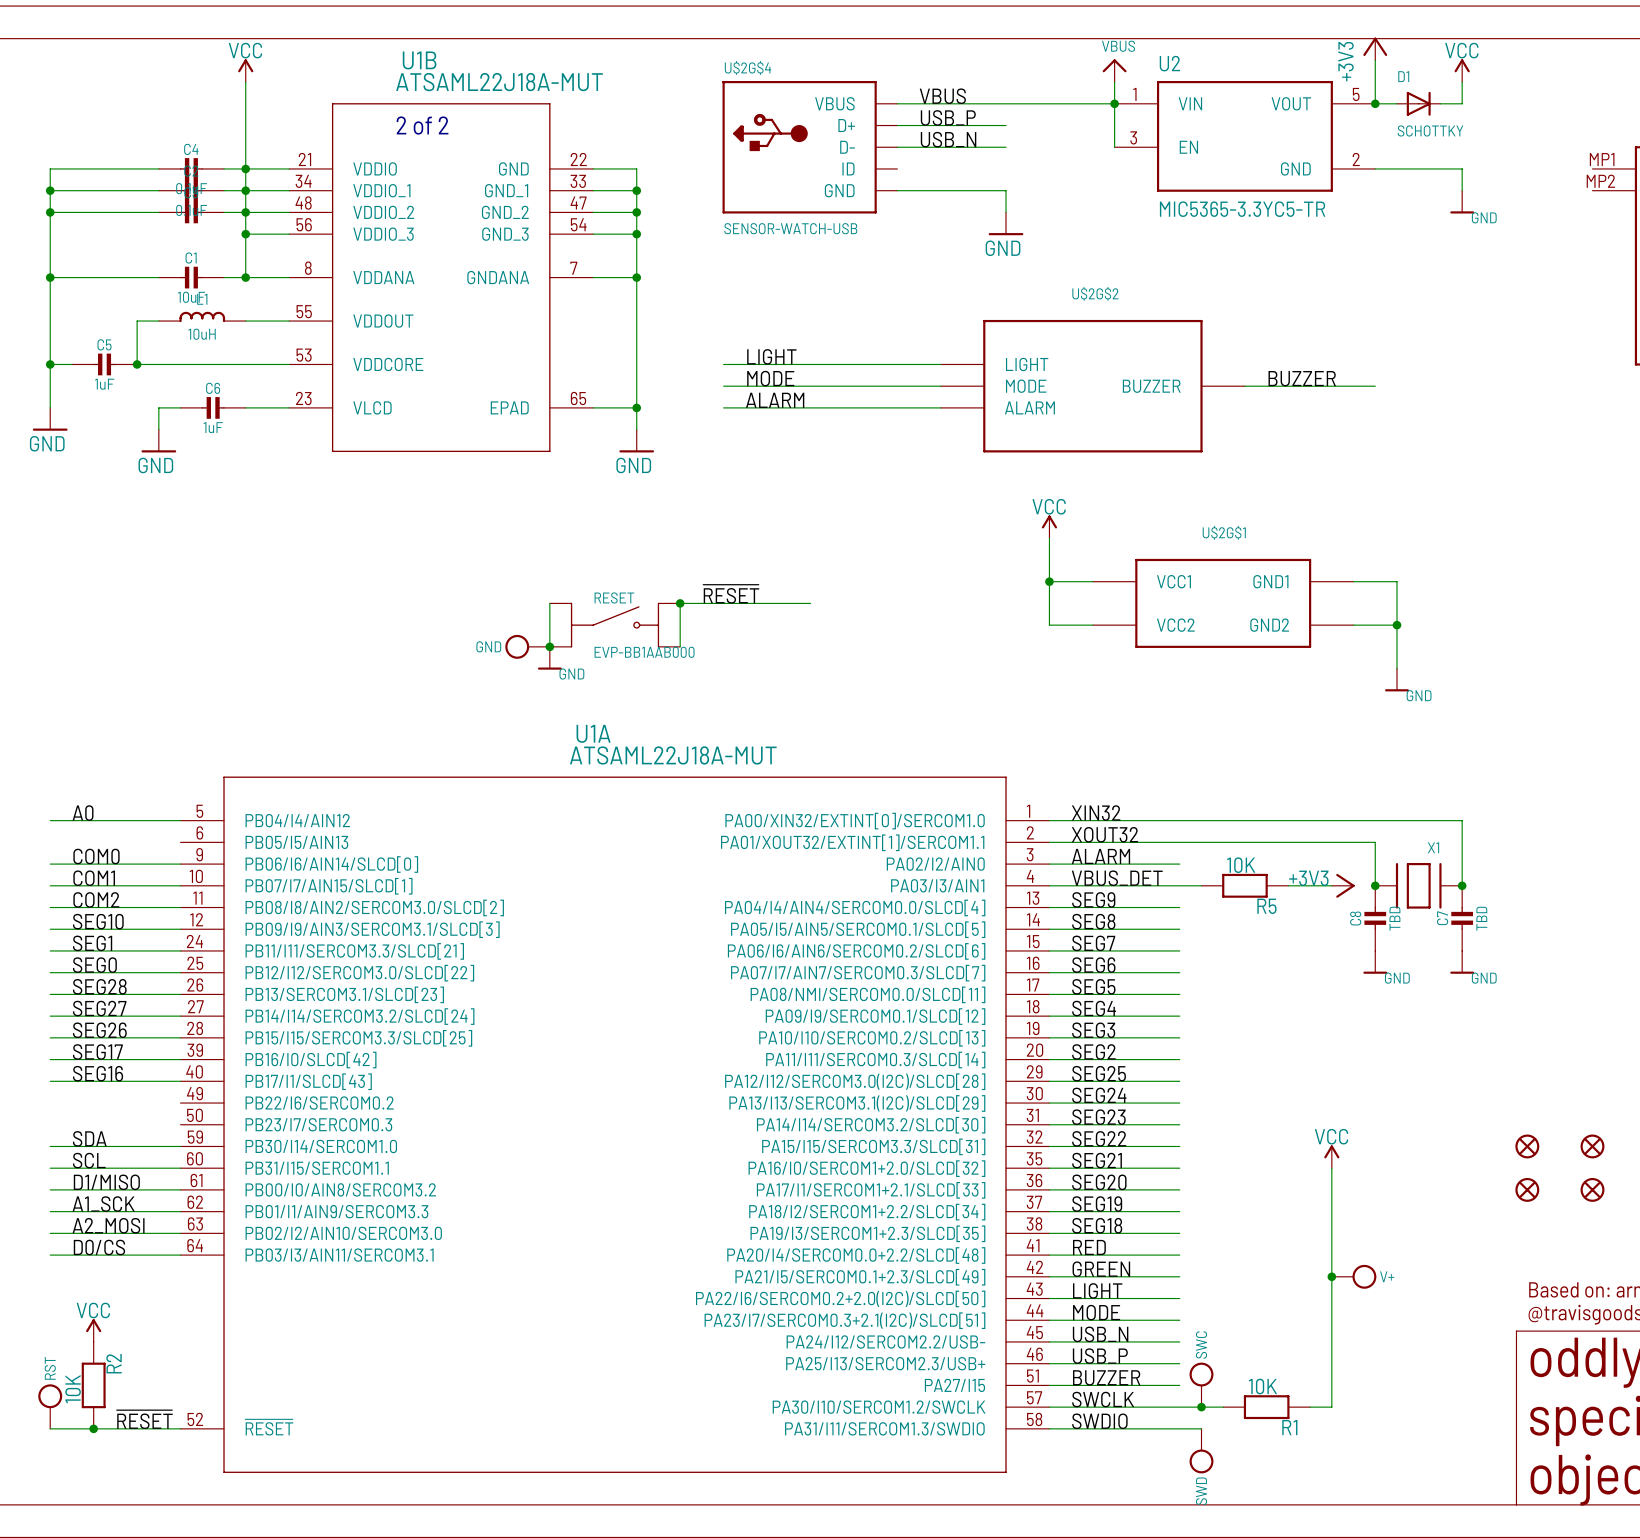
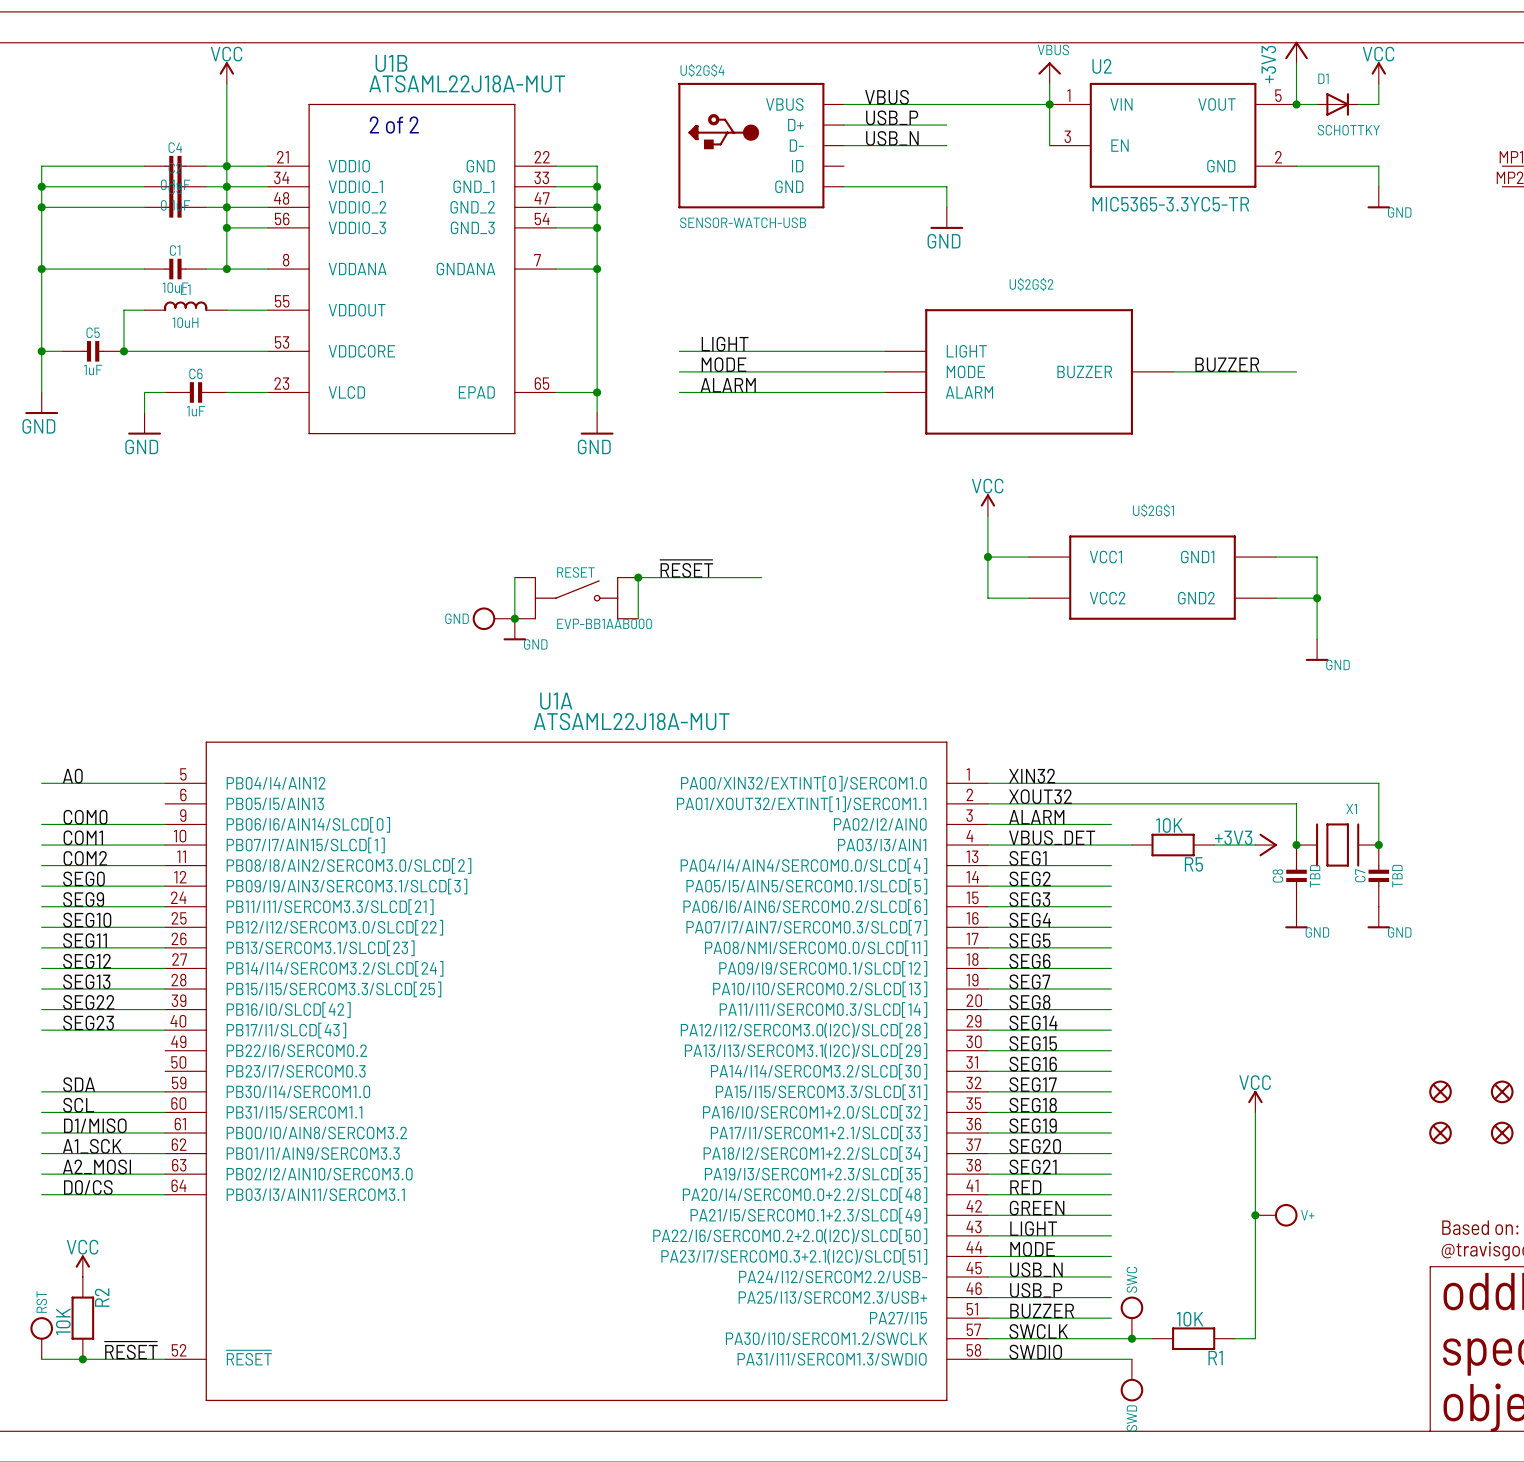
label: SEG9 (1093, 899) -> SEG1 (1028, 858)
label: SEG10 (98, 921) -> SEG0 (84, 878)
label: SEG8 (1093, 921) -> SEG2 (1030, 878)
label: SEG1 (92, 943) -> SEG9 (83, 899)
label: SEG7 (1093, 943) -> SEG3 (1029, 899)
label: SEG0 (94, 965) -> SEG10 (87, 920)
label: SEG6 (1093, 965) -> SEG4 (1030, 920)
label: SEG28 (99, 986) -> SEG11 (85, 940)
label: SEG27 (99, 1008) -> SEG12 (87, 961)
label: SEG4 (1094, 1008) -> SEG6 (1029, 961)
label: SEG26 (99, 1030) -> SEG13 (86, 981)
label: SEG3 (1093, 1030) -> SEG7 (1029, 981)
label: SEG17 (97, 1051) -> SEG22 (88, 1002)
label: SEG2 (1093, 1051) -> SEG8 (1029, 1002)
label: SEG16 (98, 1073) -> SEG23 (88, 1022)
label: SEG25 (1099, 1073) -> SEG14 (1033, 1022)
label: SEG24 (1099, 1095) -> SEG15 (1033, 1043)
label: SEG23 (1098, 1117) -> SEG16 (1033, 1064)
label: SEG22 (1099, 1138) -> SEG17 (1033, 1084)
label: SEG21 (1097, 1160) -> SEG18 (1033, 1105)
label: SEG20 (1099, 1182) -> SEG19 (1033, 1125)
label: SEG19 (1097, 1204) -> SEG20 (1035, 1146)
label: SEG18 (1097, 1225) -> SEG21 (1033, 1166)

